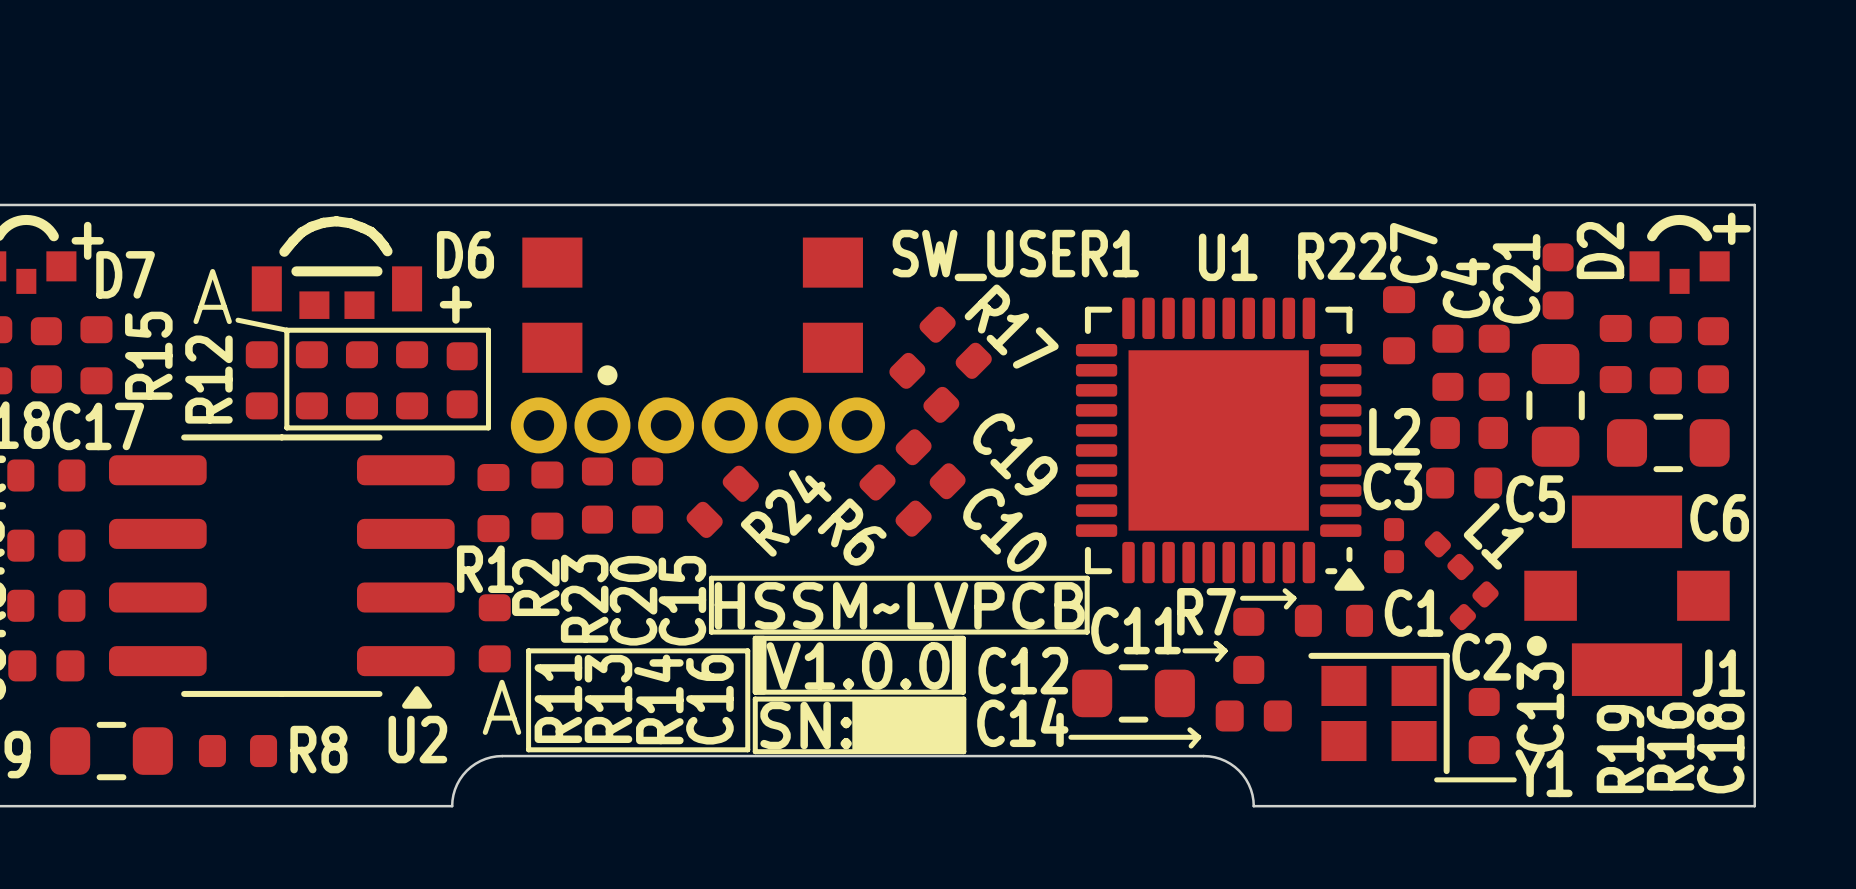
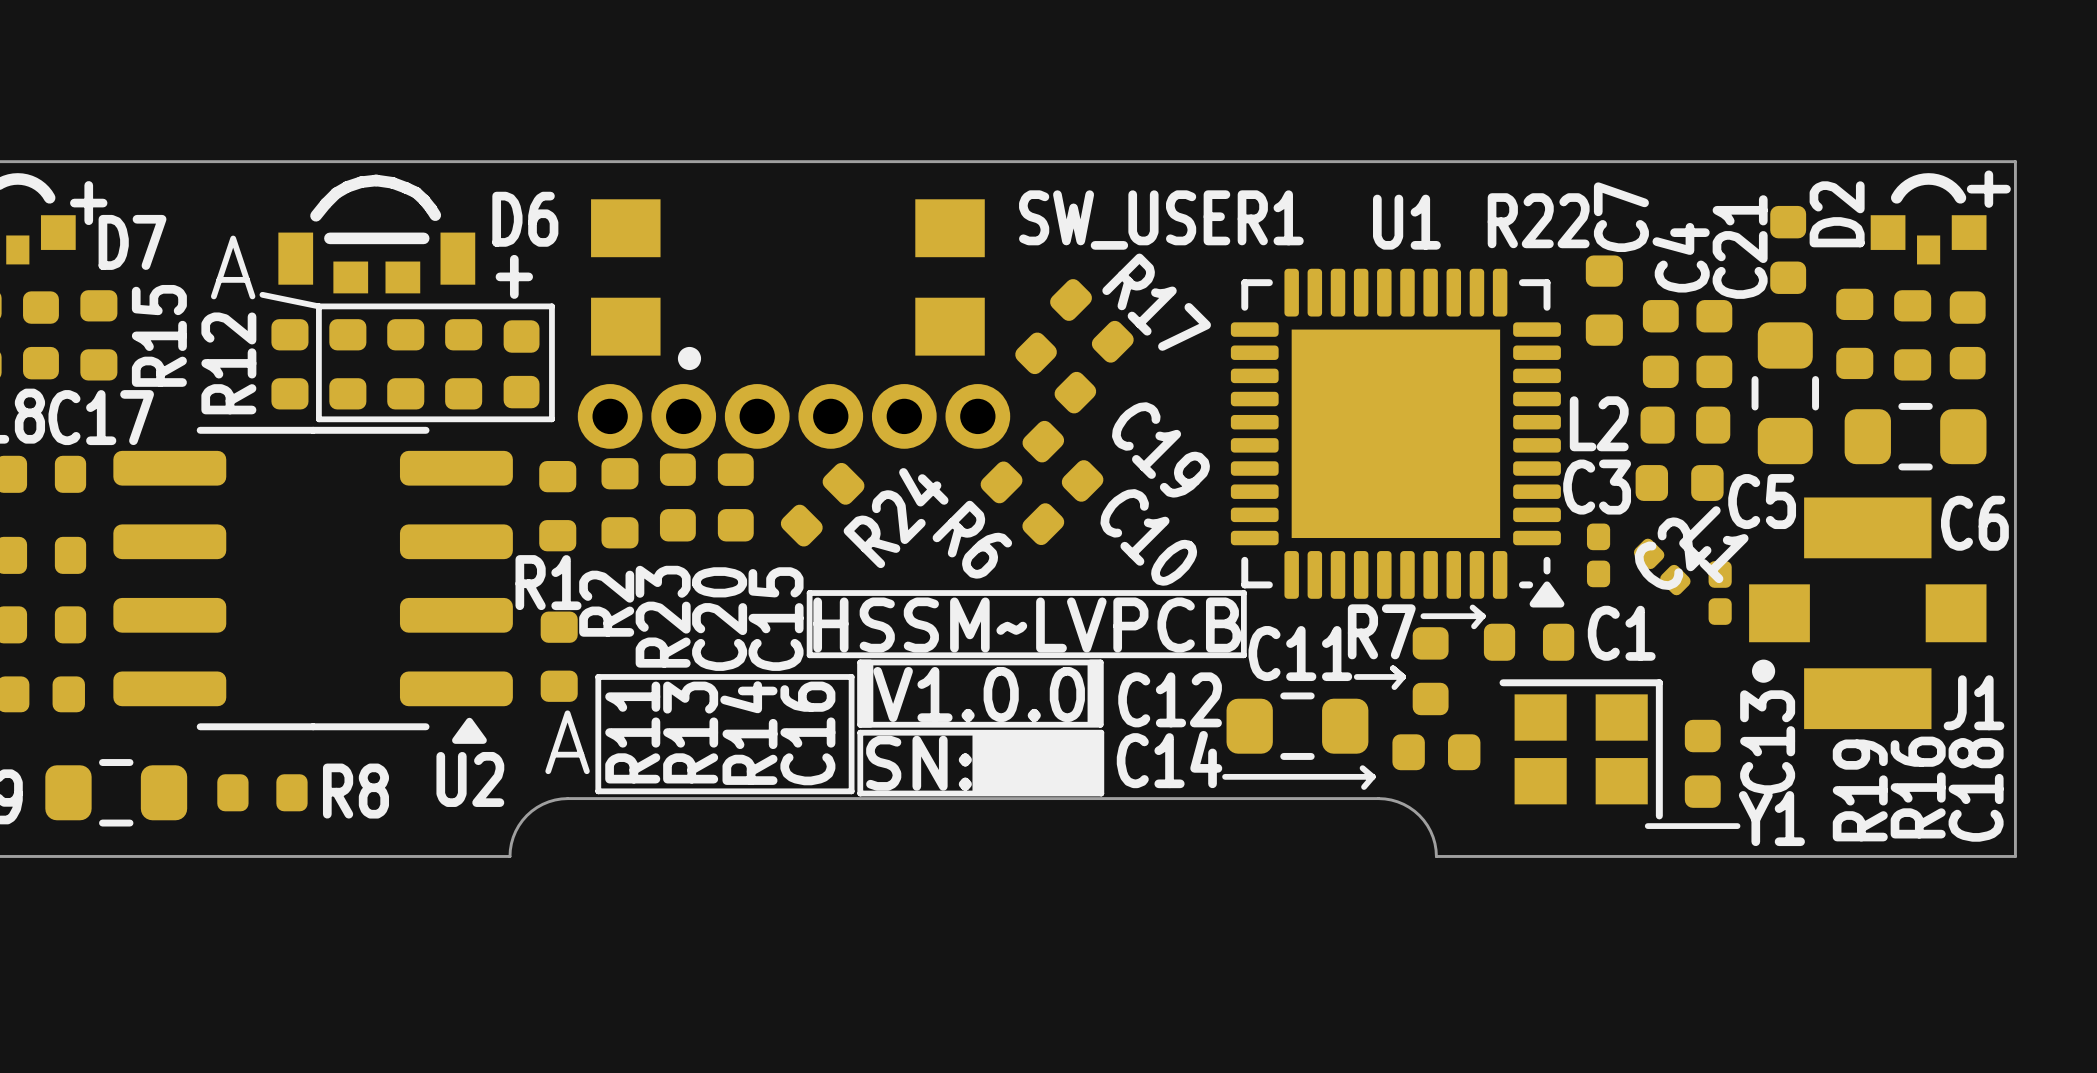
C2 rotation: 0° (1474, 605) -> 45° counterclockwise (1720, 593)
C2 position: (1474, 605) -> (1720, 593)

